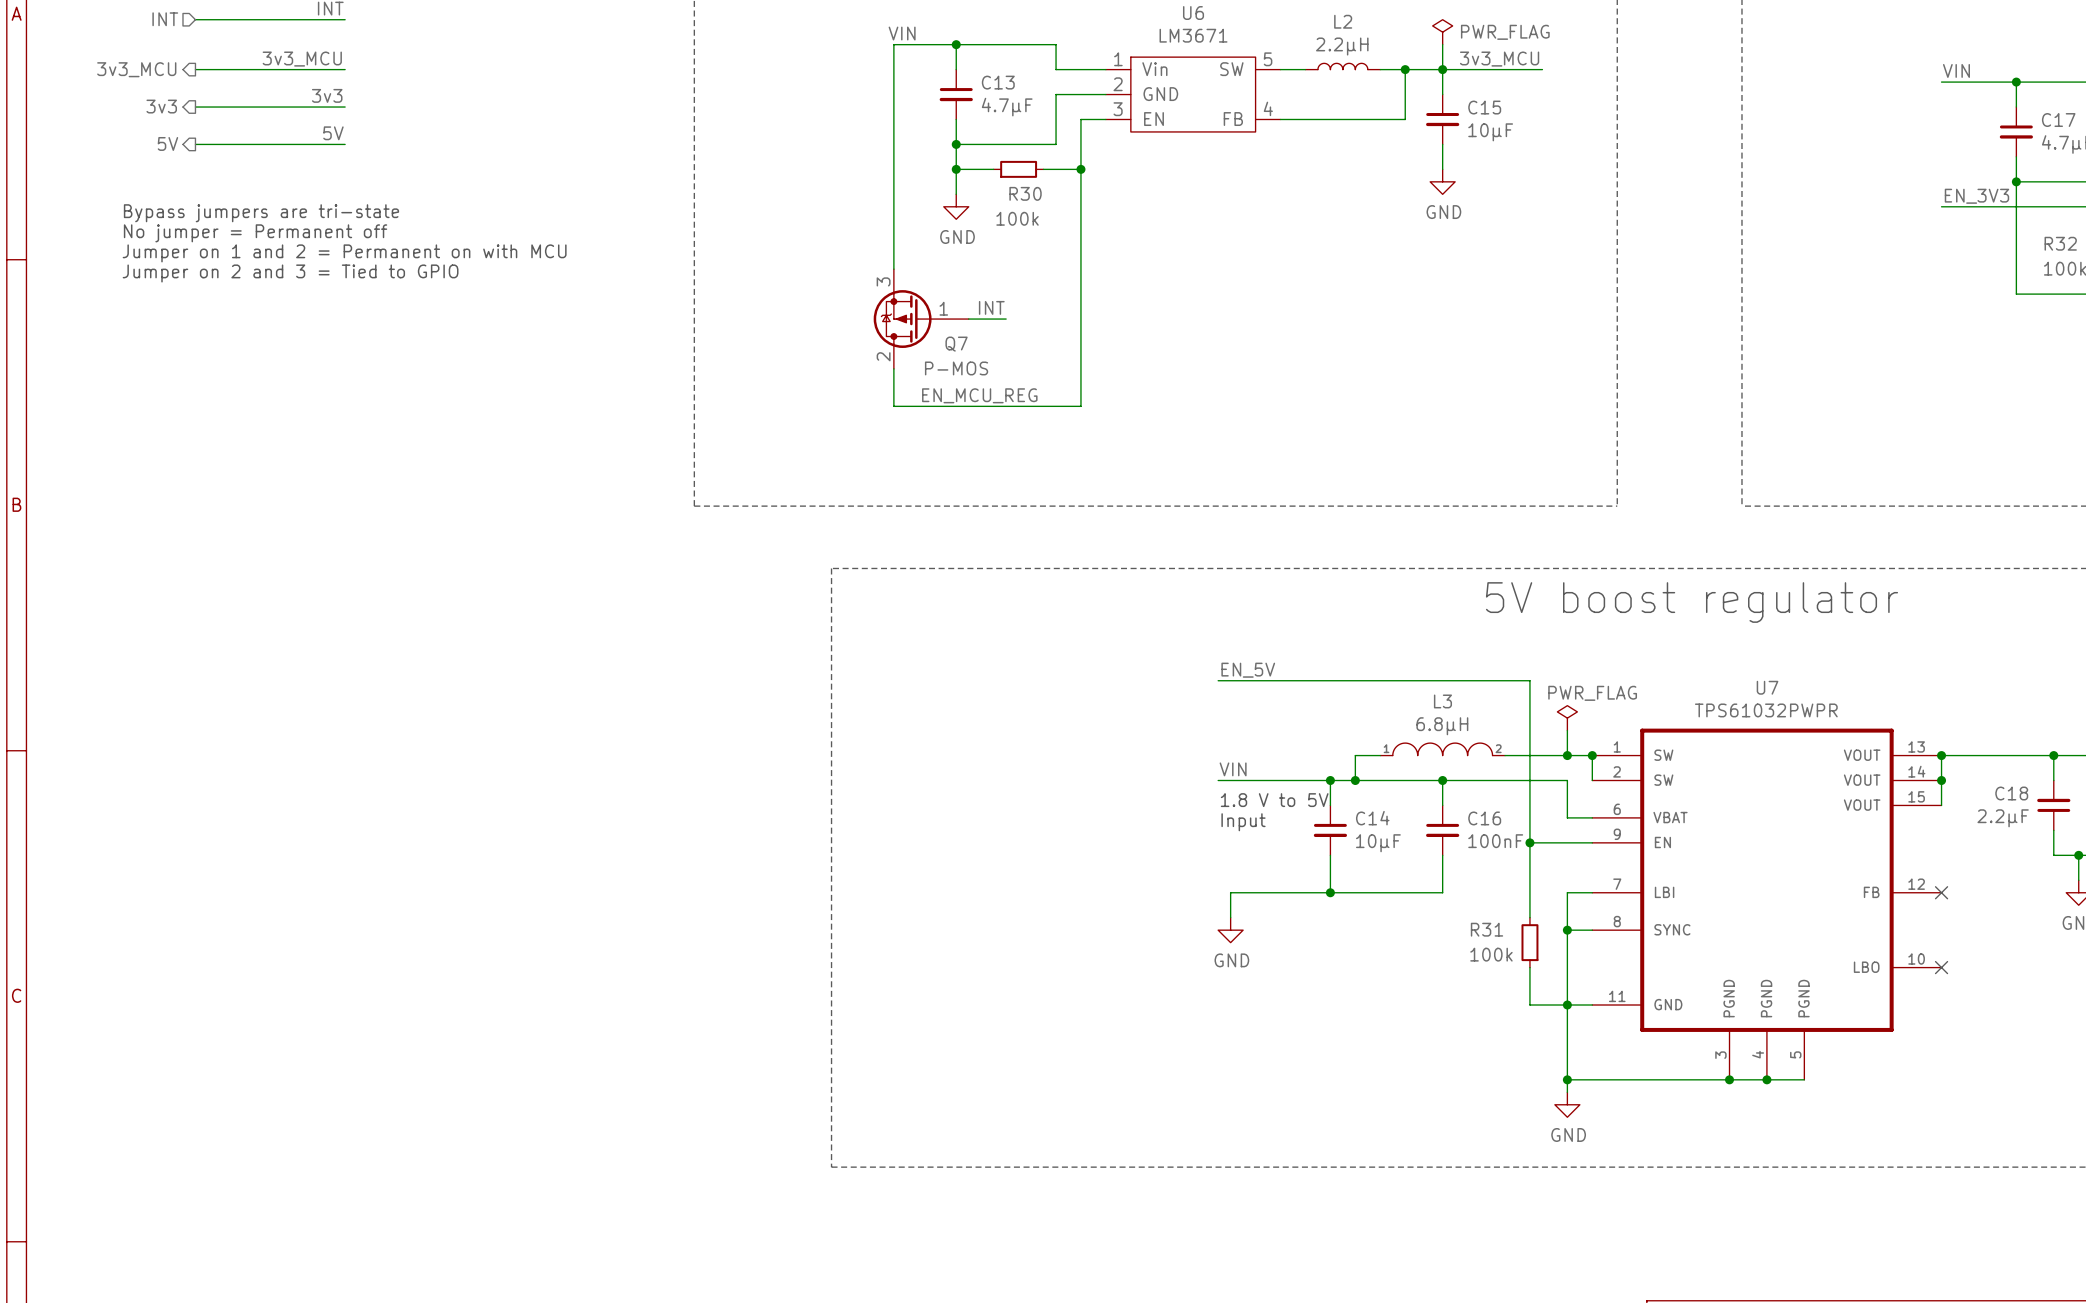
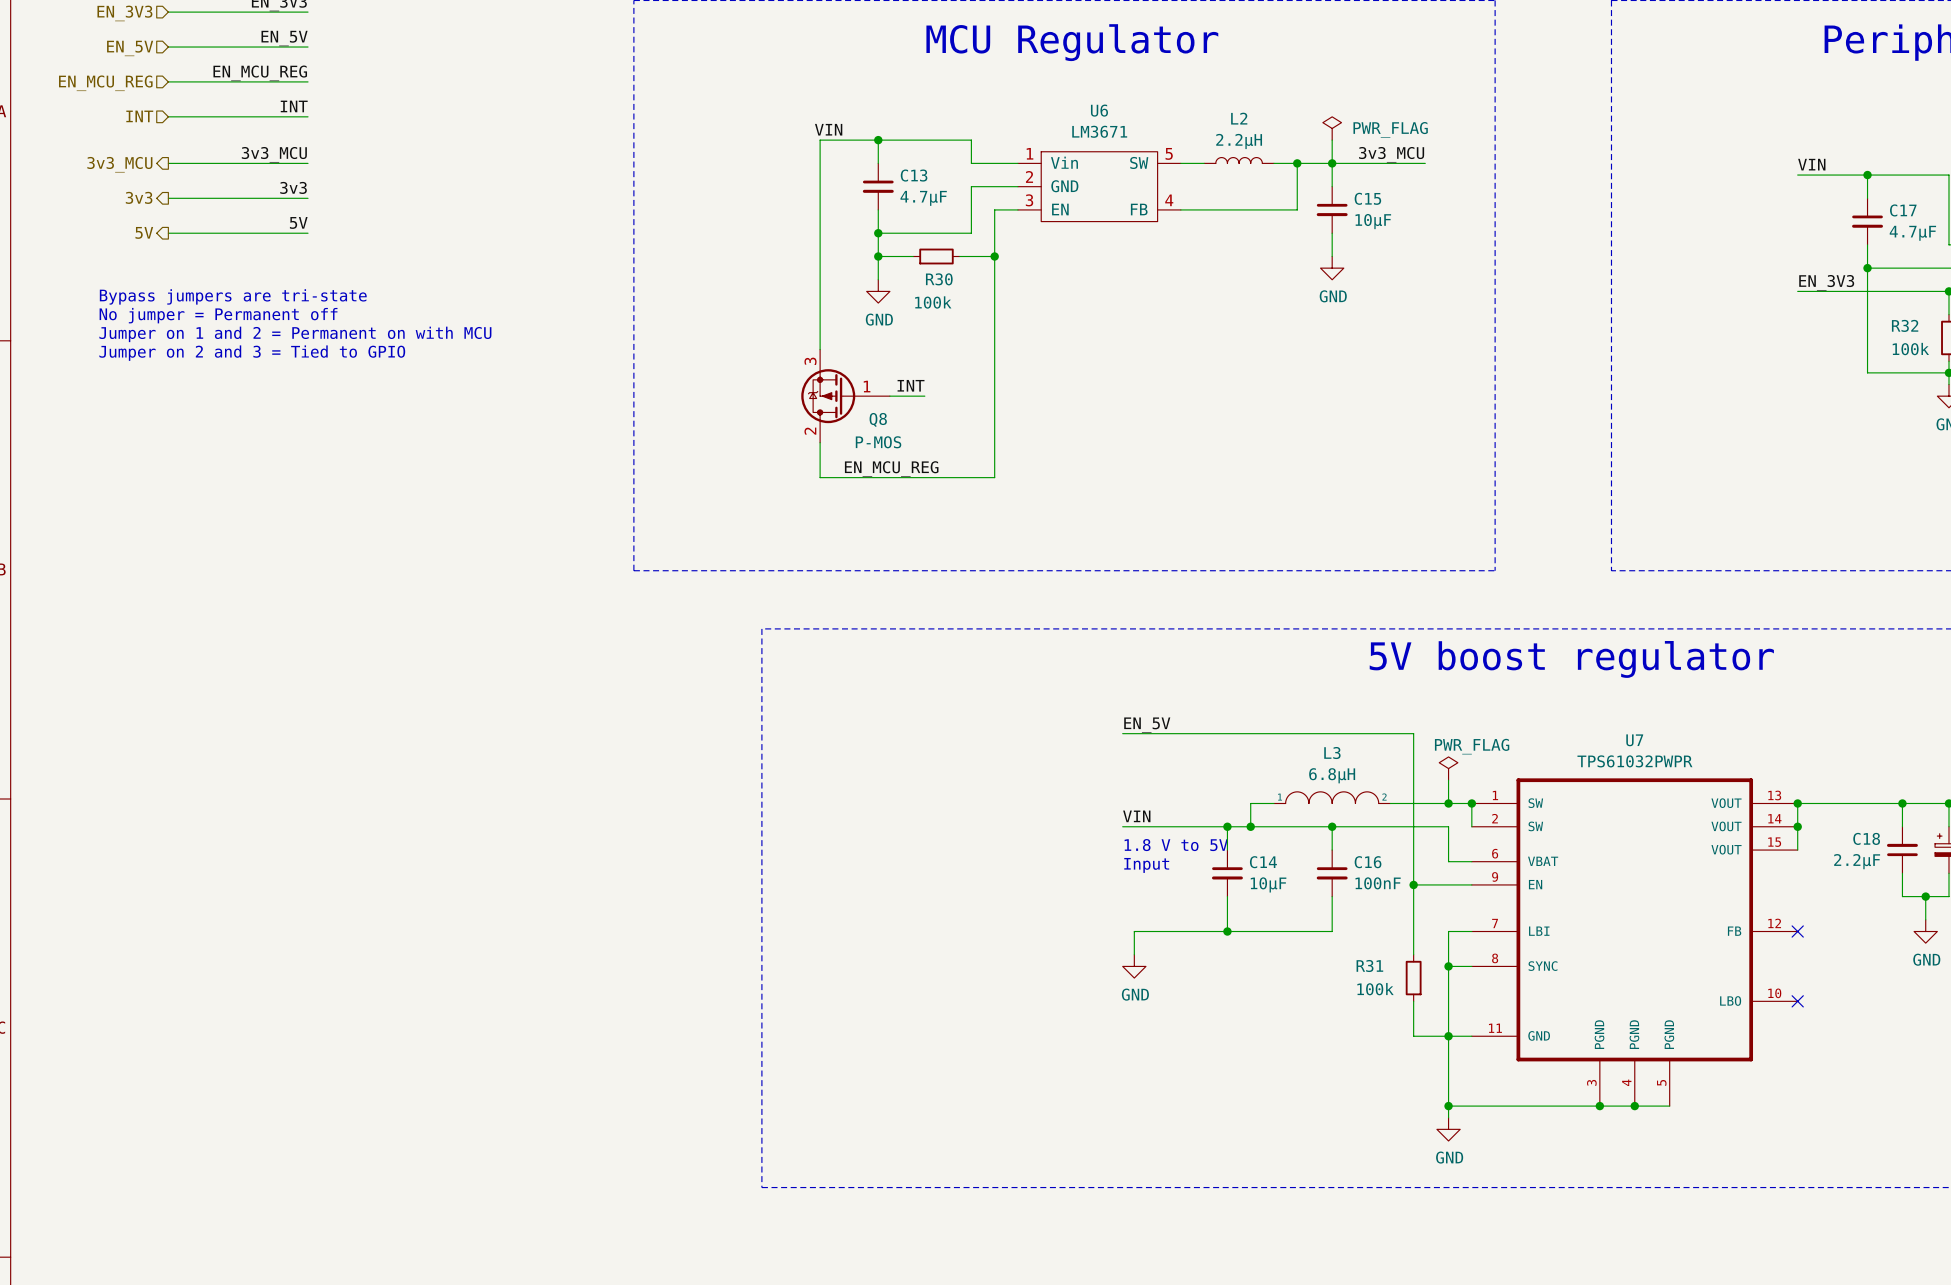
Q7 name: Q7 (956, 344) -> Q8 (878, 419)

